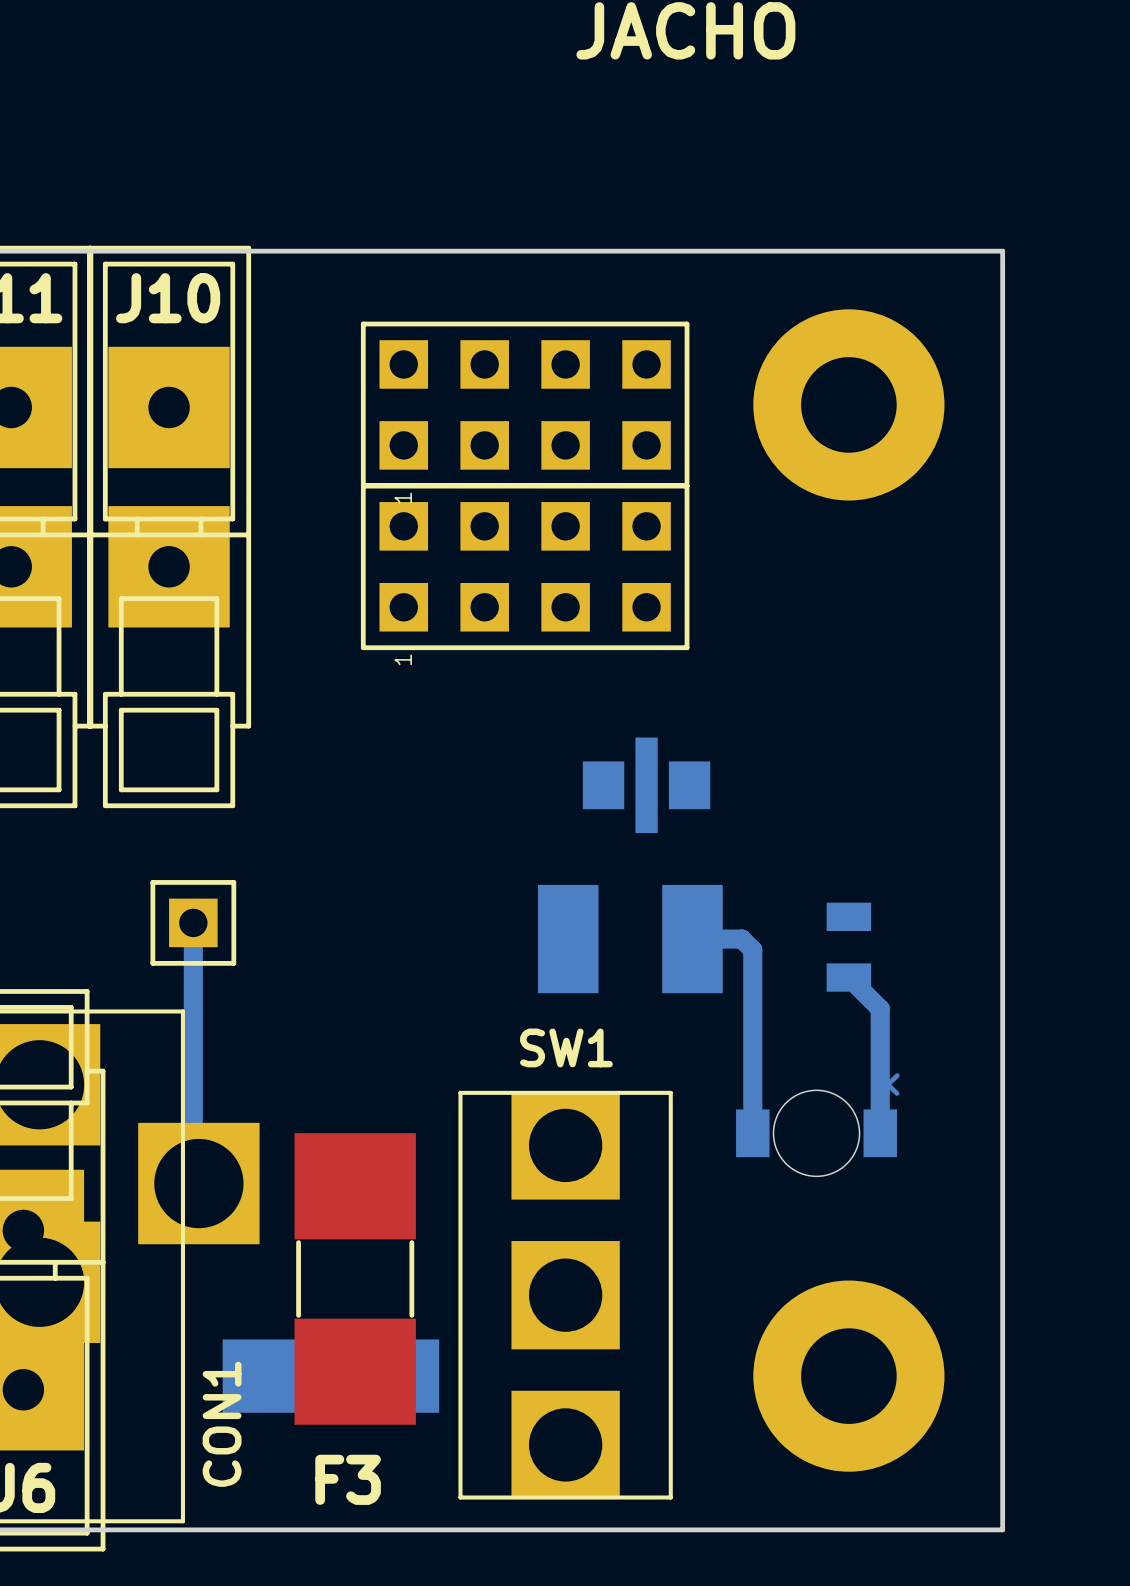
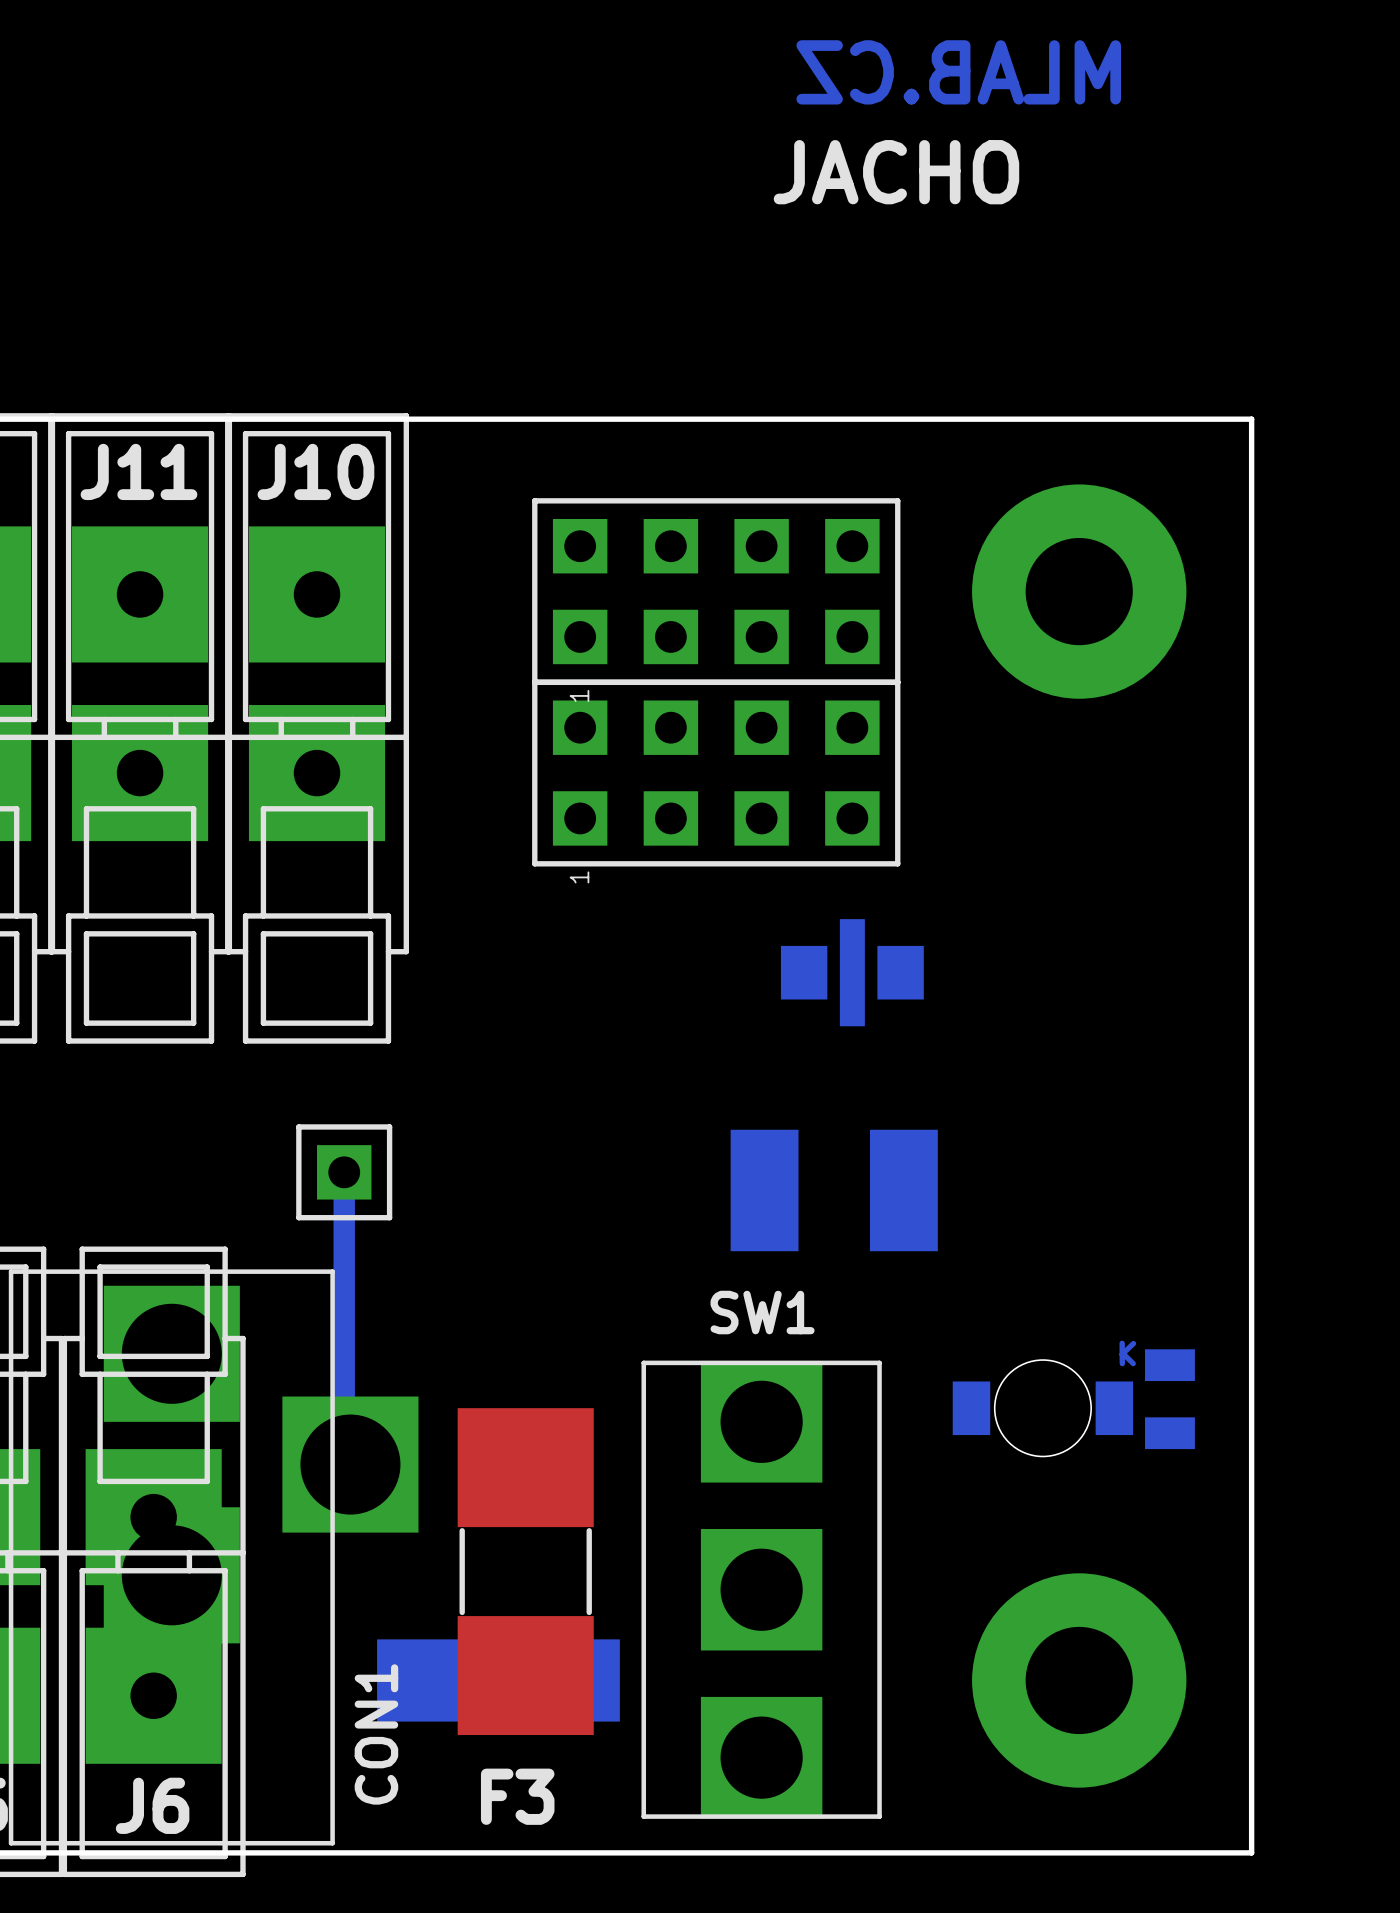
part position: (646, 785) -> (852, 972)
bottom track: (692, 939) (741, 939) (752, 949) (752, 1133) -> none
part position: (848, 947) -> (1169, 1399)
bottom track: (848, 977) (880, 1008) (880, 1133) -> none

